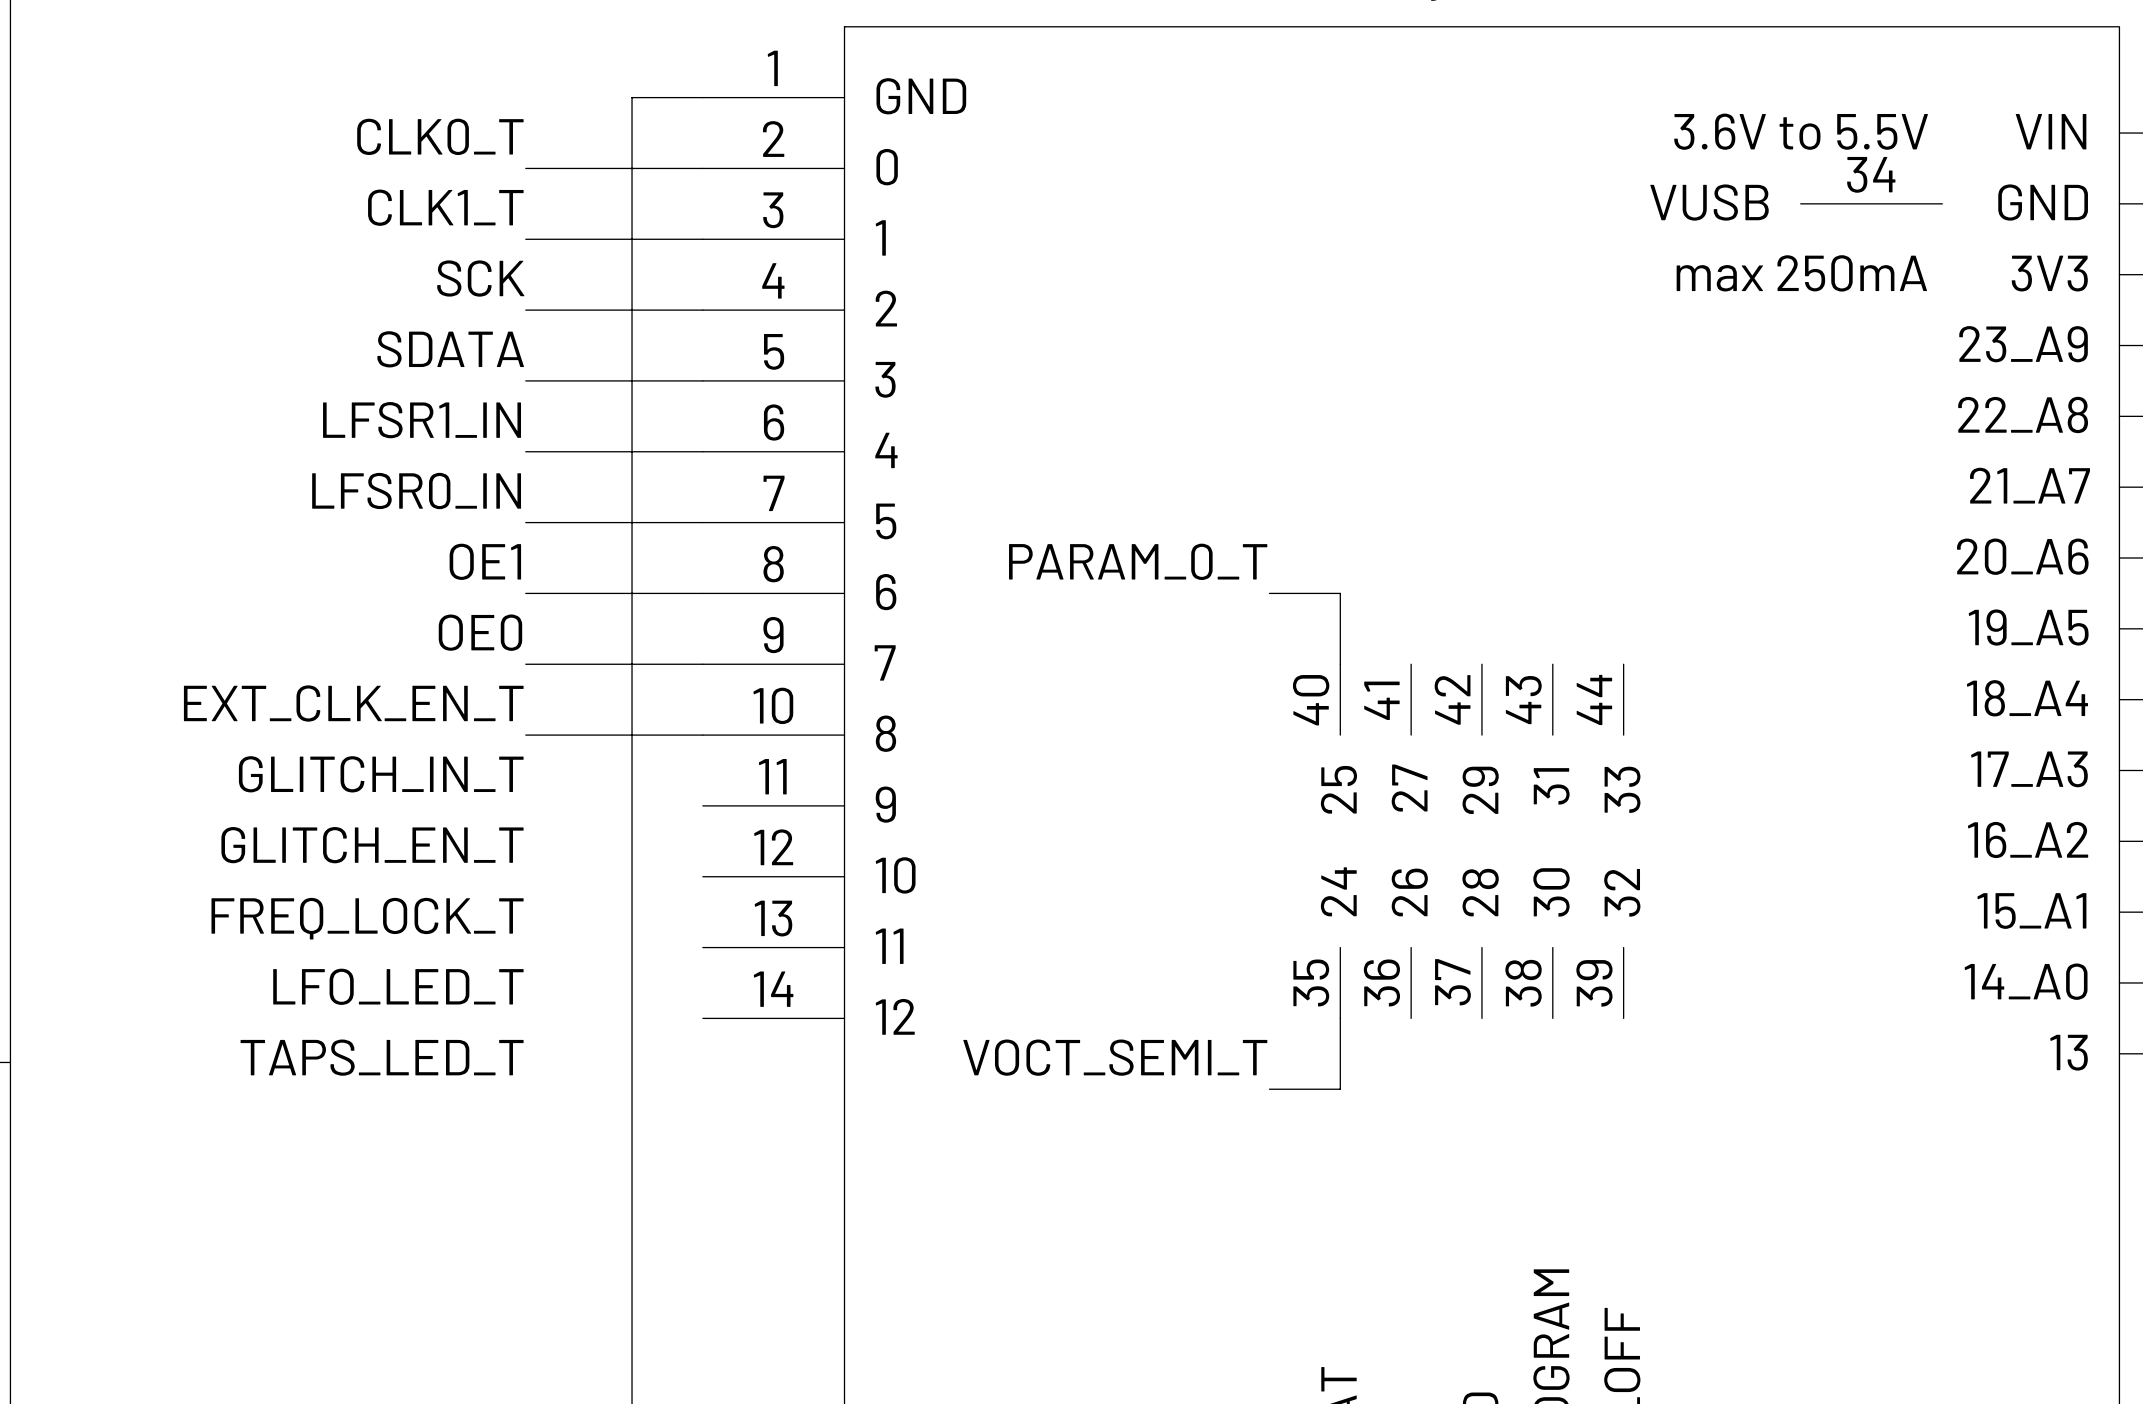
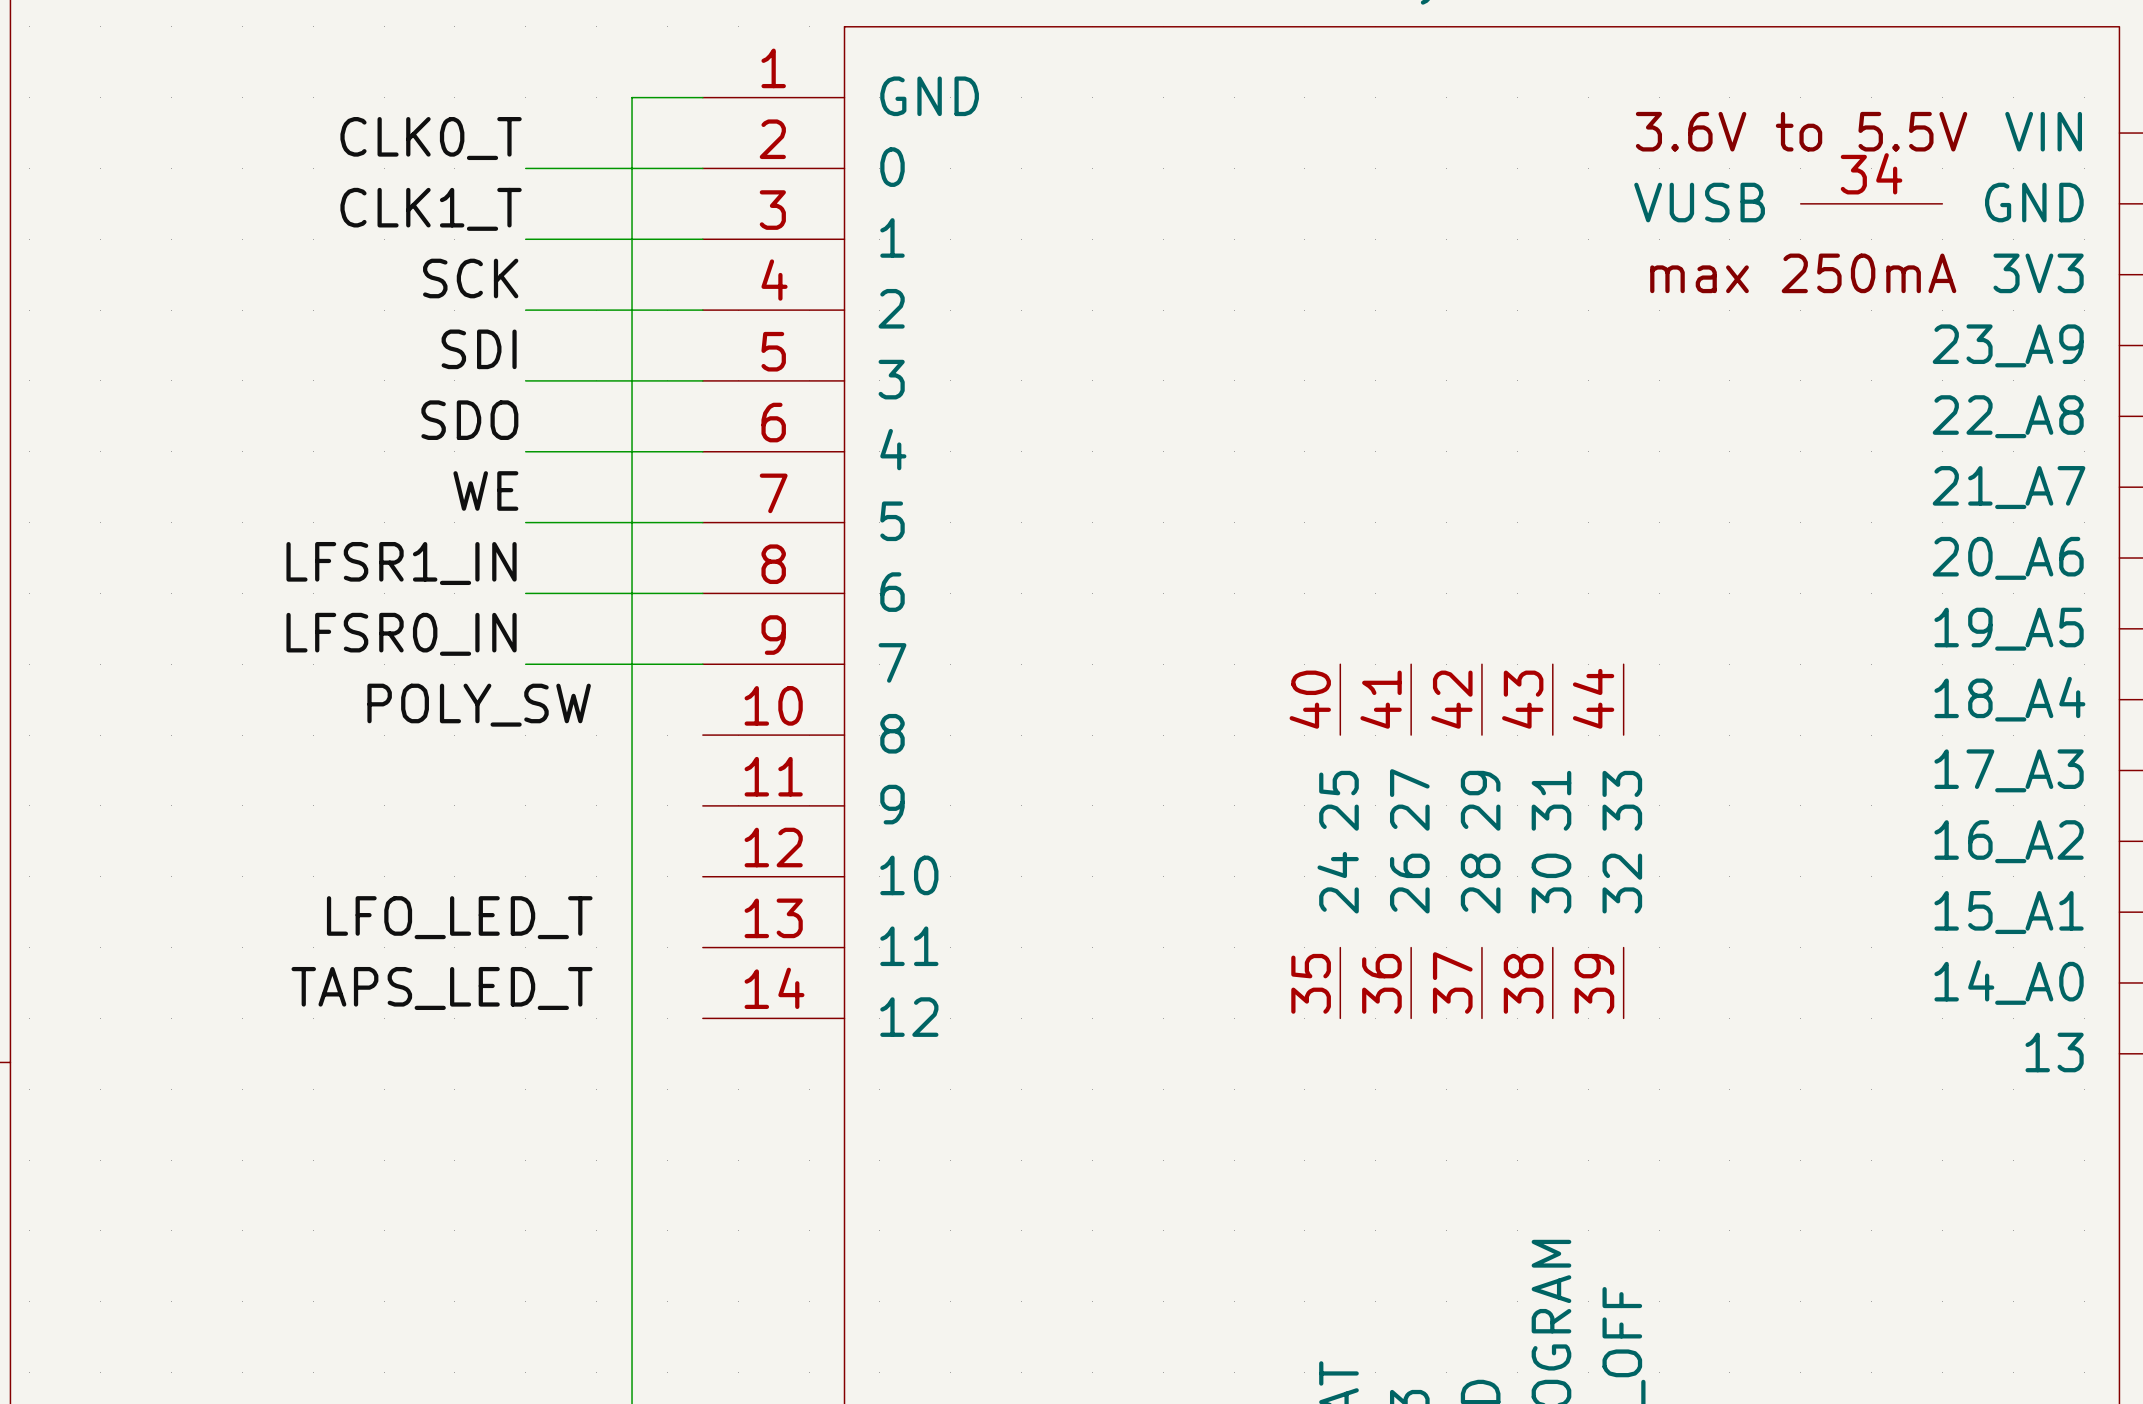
label: SDATA (450, 349) -> SDI (479, 349)
label: LFSR1_IN (422, 420) -> SDO (469, 420)
label: LFSR0_IN (416, 491) -> WE (485, 490)
label: OE1 (485, 561) -> LFSR1_IN (401, 563)
label: PARAM_0_T (1138, 561) -> none
wire: (1269, 593) (1340, 593) (1340, 664) -> none
label: OE0 (480, 632) -> LFSR0_IN (401, 634)
label: EXT_CLK_EN_T (353, 703) -> none
label: none -> POLY_SW (479, 705)
wire: (525, 735) (702, 735) -> none
label: GLITCH_IN_T (381, 774) -> none
label: GLITCH_EN_T (372, 845) -> none
label: FREQ_LOCK_T (367, 918) -> none
label position: LFO_LED_T (398, 986) -> LFO_LED_T (459, 917)
wire: (1340, 1018) (1340, 1089) (1269, 1089) -> none
label position: TAPS_LED_T (382, 1057) -> TAPS_LED_T (442, 988)
label: VOCT_SEMI_T (1115, 1057) -> none

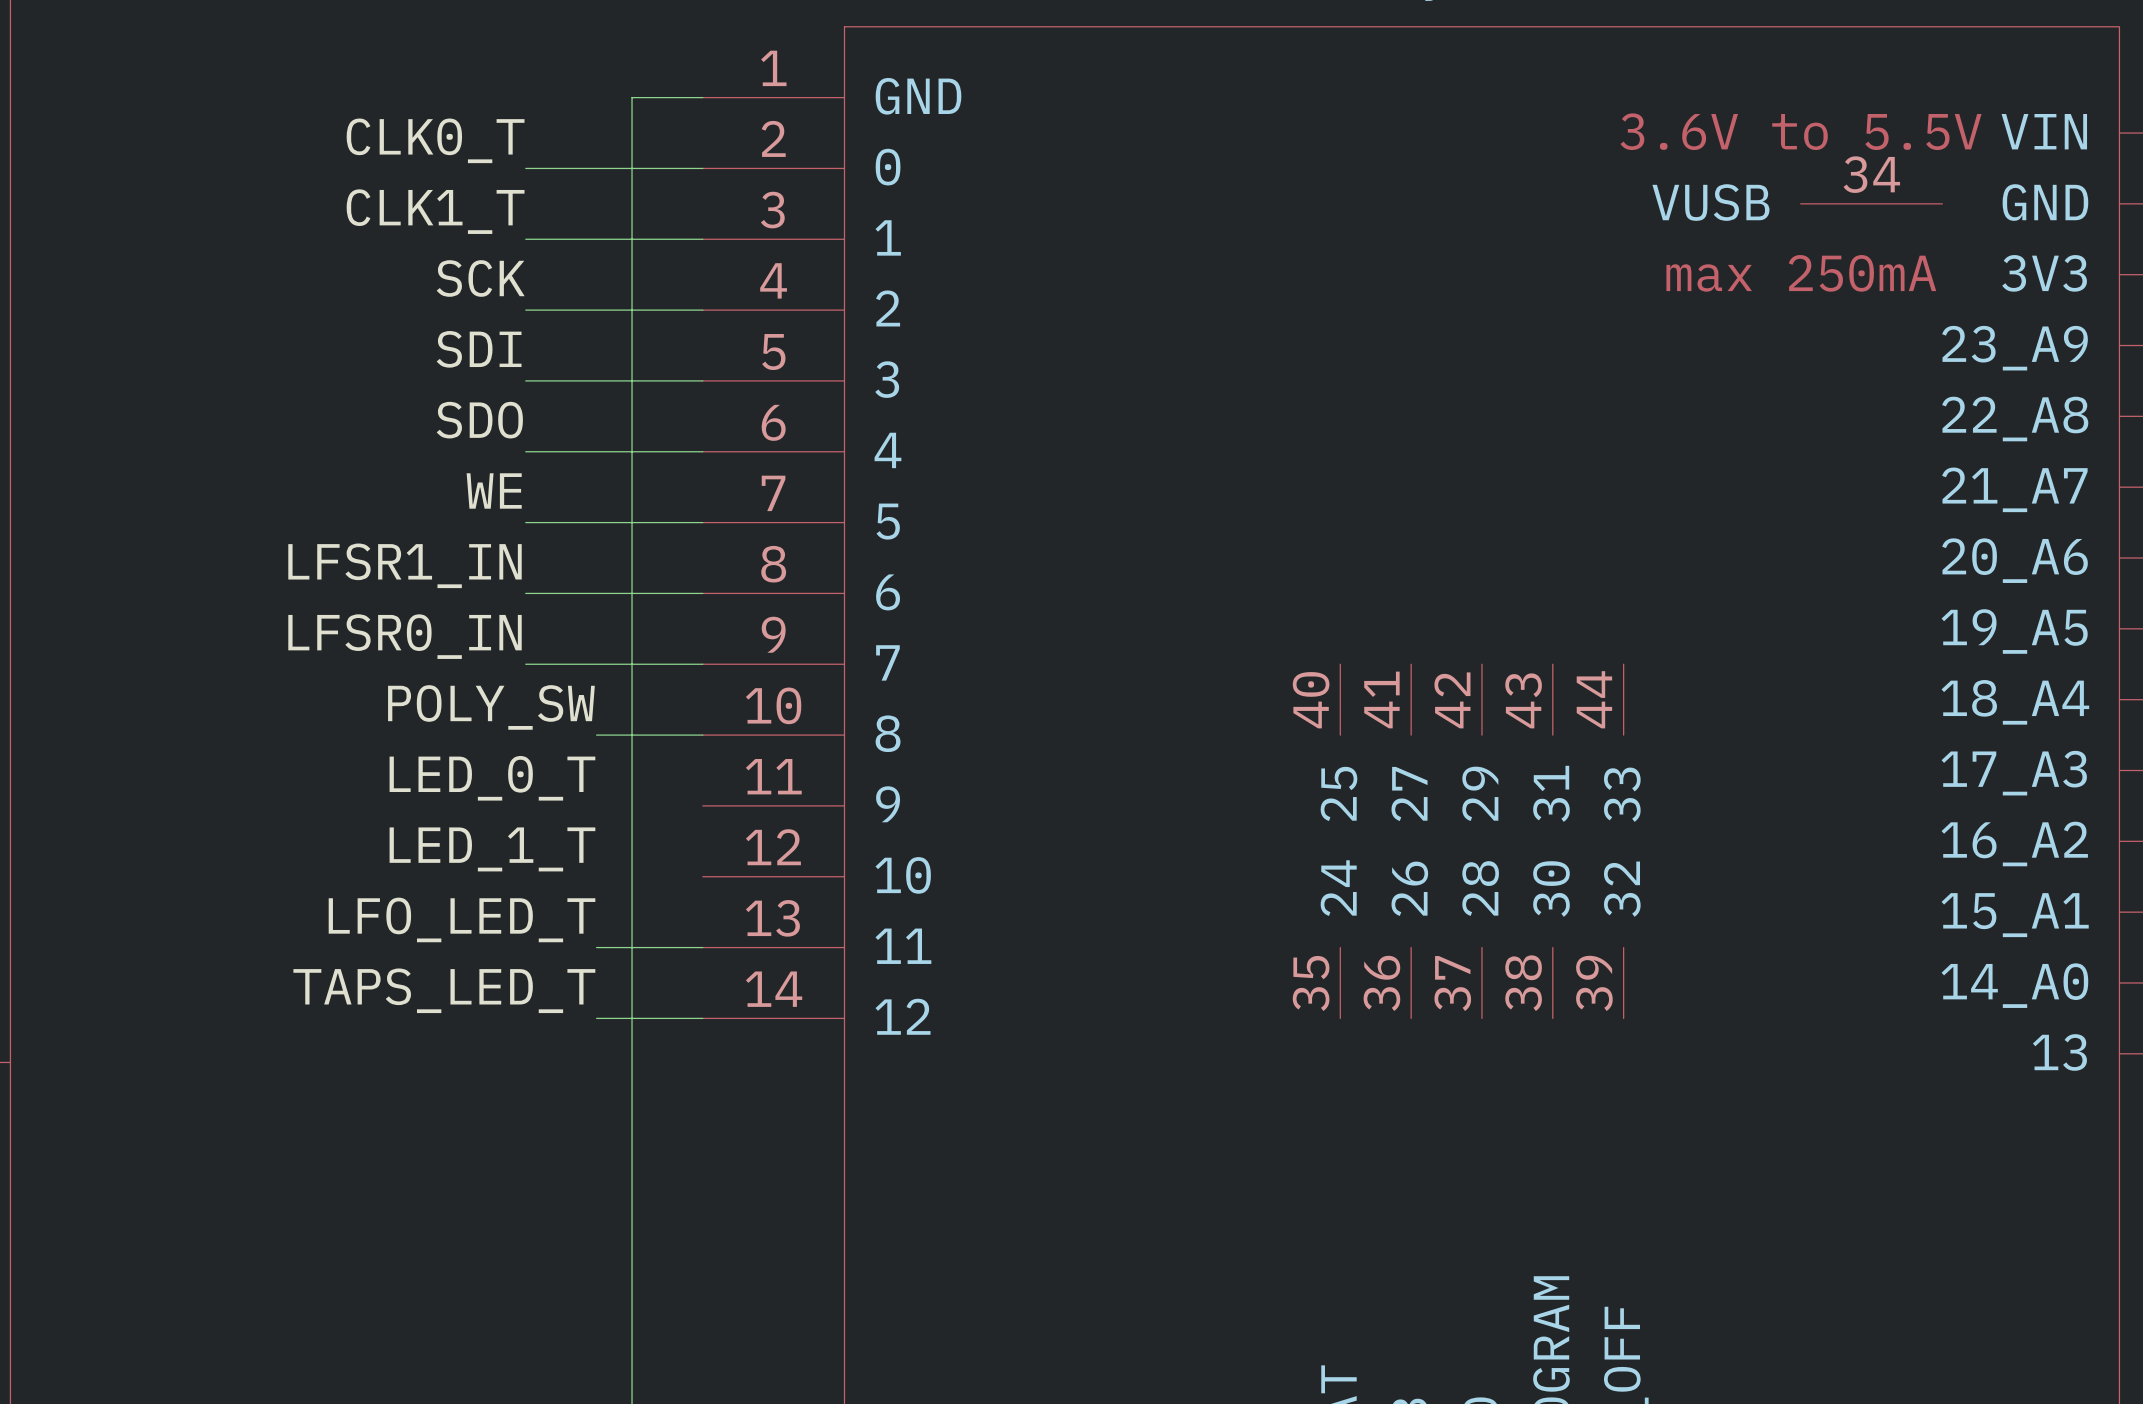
wire: none -> (596, 735) (702, 735)
label: none -> LED_0_T (492, 778)
label: none -> LED_1_T (492, 849)
wire: none -> (596, 947) (702, 947)
wire: none -> (596, 1018) (702, 1018)

